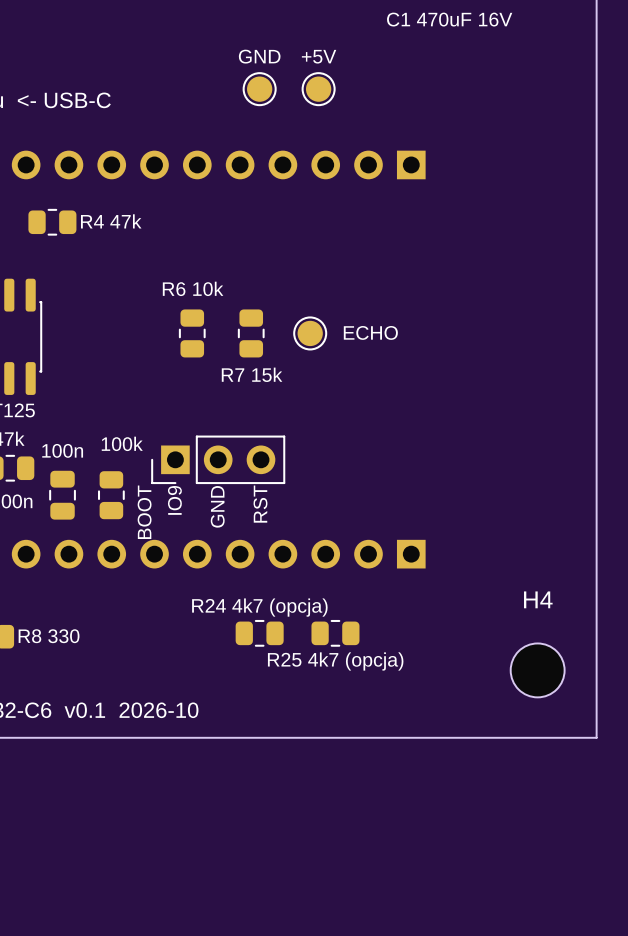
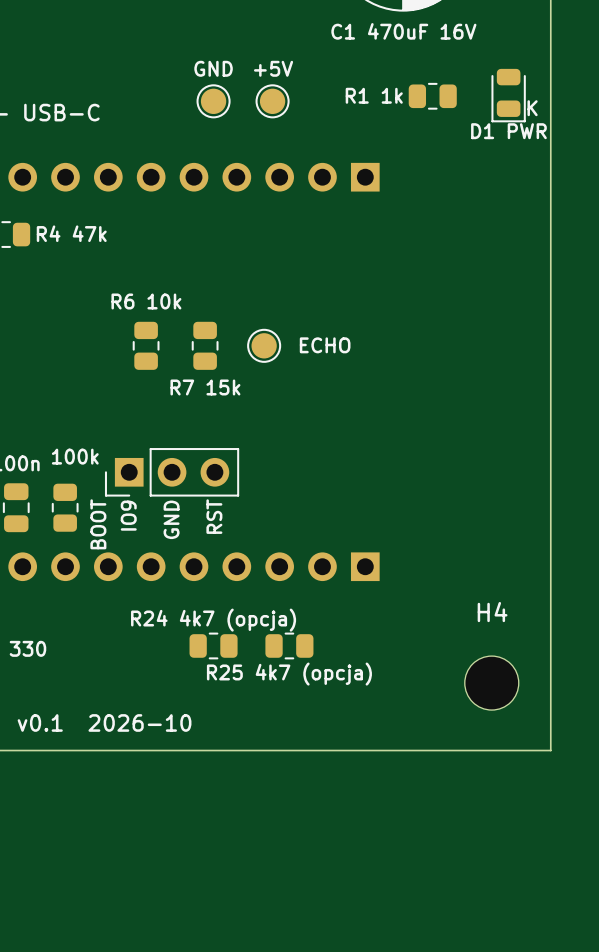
text: none -> R1 1k (374, 95)
part: none -> (508, 95)
part: none -> (432, 96)
text: none -> K (532, 108)
text: none -> D1 PWR (508, 131)

